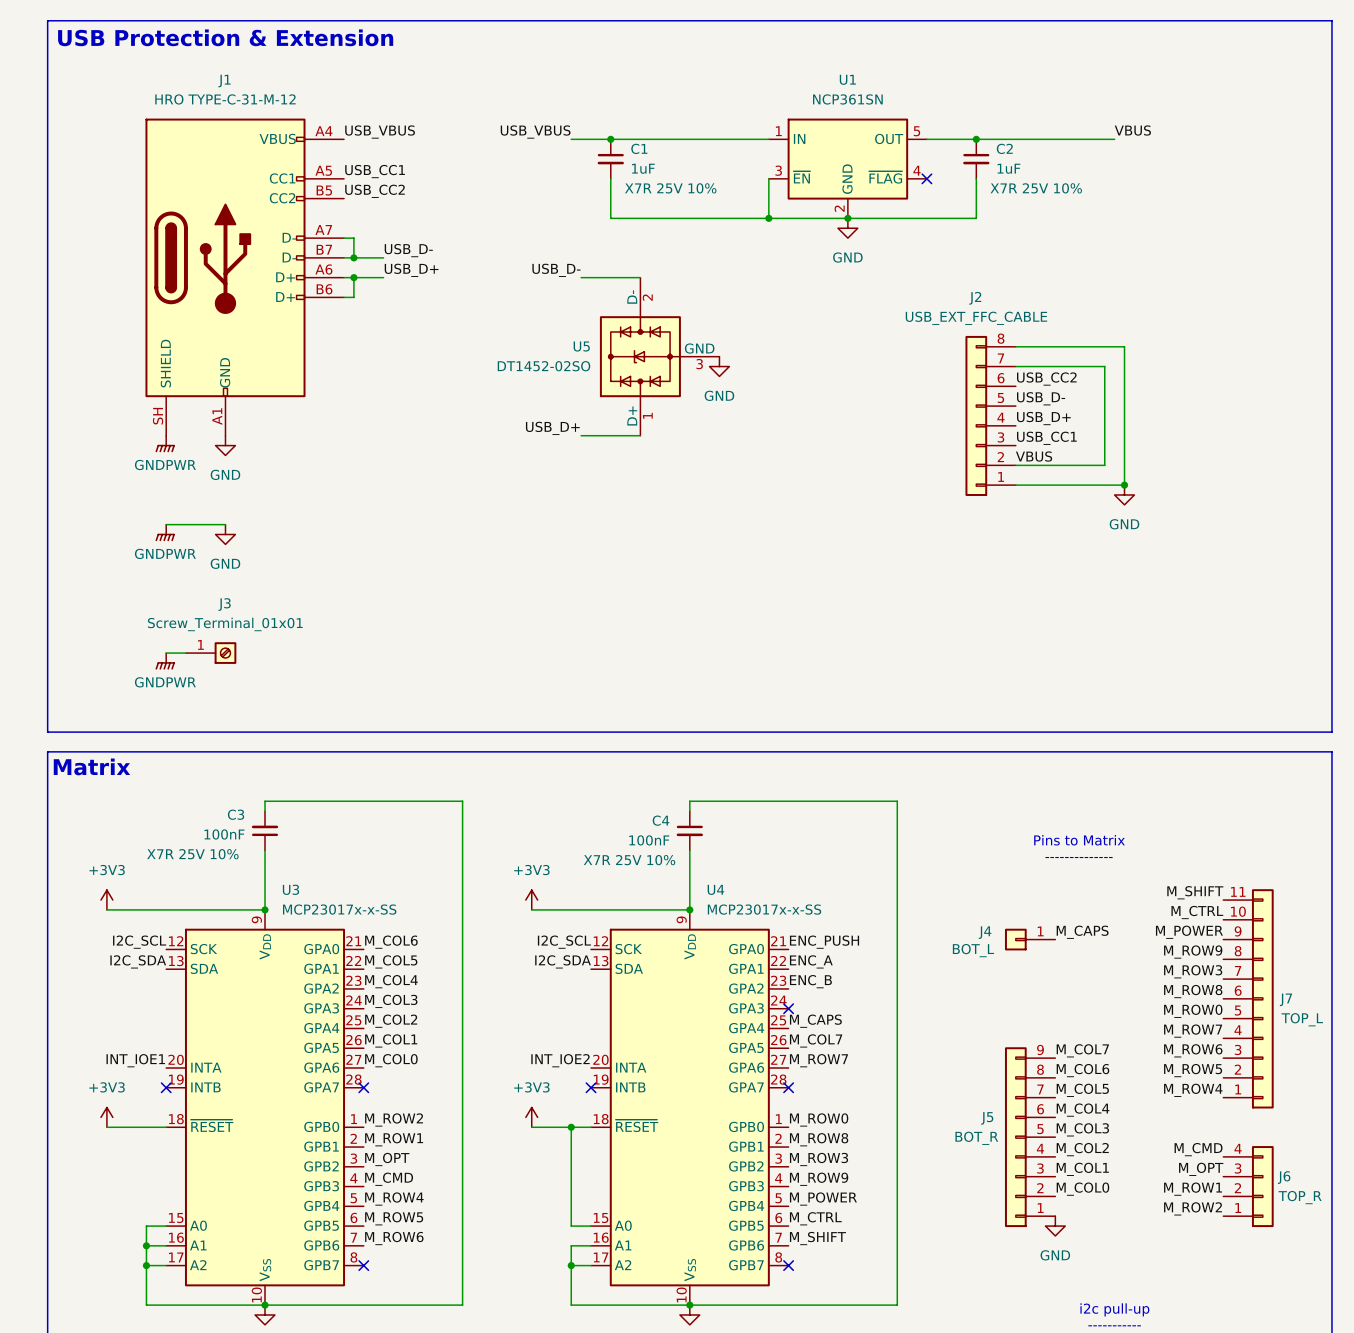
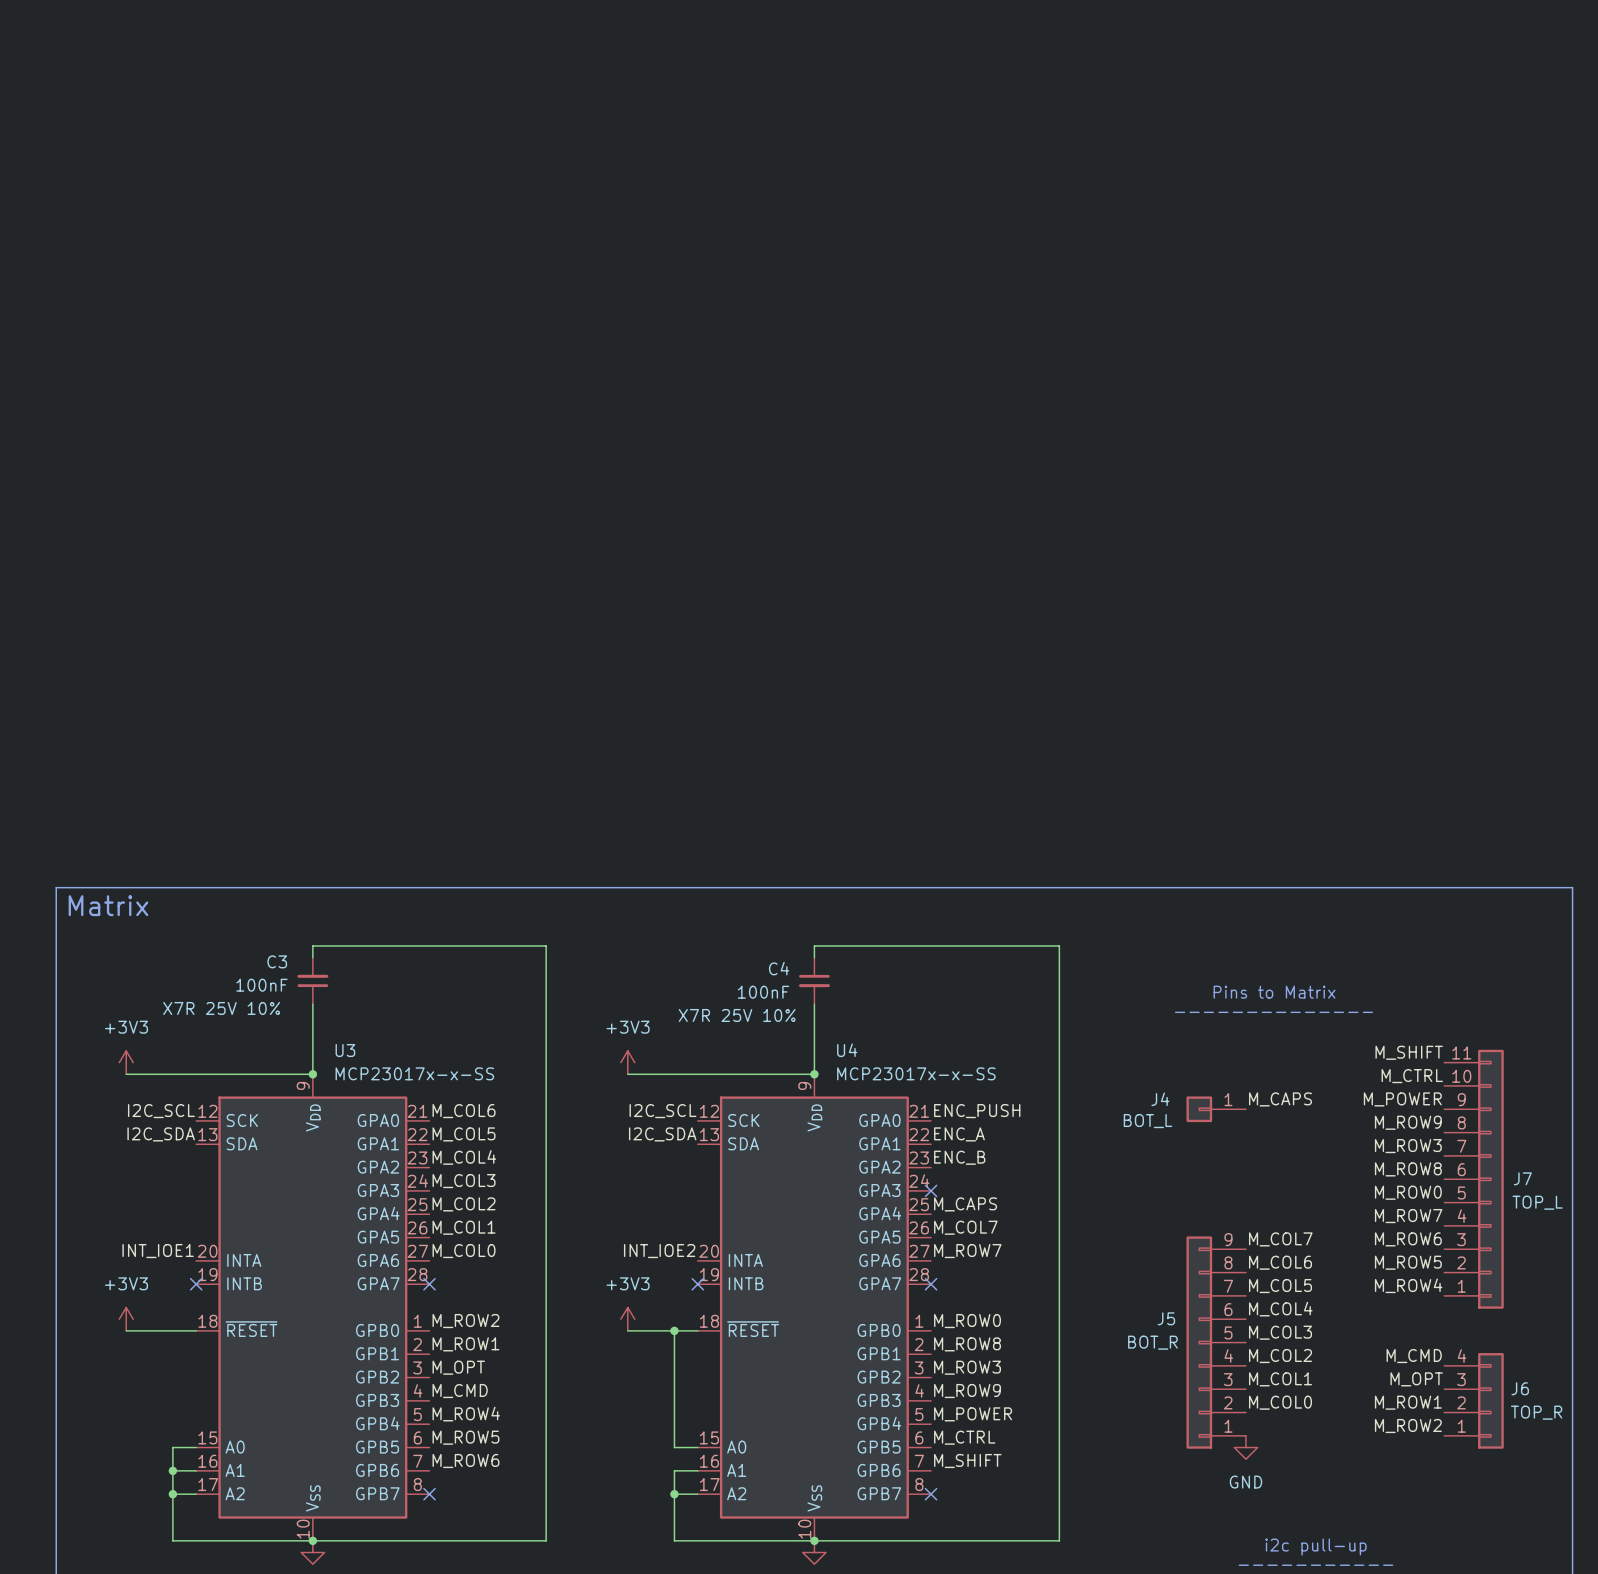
line: (47, 20) (1331, 20) (1331, 732) (47, 732) (47, 20) -> none
text: USB Protection & Extension (225, 37) -> none
label: VBUS (1132, 130) -> none
label: USB_VBUS (380, 132) -> none
label: USB_VBUS (535, 132) -> none
wire: (571, 139) (768, 139) -> none
junction: (610, 139) -> none
wire: (926, 139) (1114, 139) -> none
junction: (976, 139) -> none
C1: 1uF (610, 159) -> none
C2: 1uF (976, 159) -> none
U1: NCP361SN (847, 168) -> none
label: USB_CC1 (375, 171) -> none
wire: (610, 178) (610, 218) (976, 218) (976, 178) -> none
wire: (768, 178) (768, 218) -> none
no-connect mark: (926, 178) -> none
label: USB_CC2 (375, 191) -> none
junction: (768, 218) -> none
junction: (847, 218) -> none
power symbol: GND (847, 228) -> none
wire: (344, 238) (353, 238) (353, 257) -> none
label: USB_D- (408, 250) -> none
wire: (344, 257) (383, 257) -> none
junction: (353, 257) -> none
label: USB_D+ (411, 270) -> none
label: USB_D- (556, 270) -> none
J1: HRO TYPE-C-31-M-12 (244, 277) -> none
wire: (344, 277) (383, 277) -> none
wire: (353, 277) (353, 297) (344, 297) -> none
junction: (353, 277) -> none
wire: (581, 277) (640, 277) -> none
wire: (1015, 346) (1124, 346) (1124, 485) (1015, 485) -> none
U5: DT1452-02SO (659, 356) -> none
power symbol: GND (719, 366) -> none
wire: (1015, 366) (1104, 366) (1104, 465) (1015, 465) -> none
label: USB_CC2 (1046, 379) -> none
label: USB_D- (1041, 398) -> none
J2: USB_EXT_FFC_CABLE (990, 415) -> none
label: USB_D+ (1043, 418) -> none
label: USB_D+ (552, 428) -> none
wire: (581, 435) (640, 435) -> none
label: USB_CC1 (1046, 438) -> none
power symbol: GNDPWR (165, 444) -> none
power symbol: GND (225, 445) -> none
label: VBUS (1034, 456) -> none
junction: (1124, 485) -> none
power symbol: GND (1124, 494) -> none
wire: (166, 524) (225, 524) -> none
power symbol: GNDPWR (165, 532) -> none
power symbol: GND (225, 534) -> none
wire: (166, 653) (185, 653) -> none
J3: Screw_Terminal_01x01 (211, 653) -> none
power symbol: GNDPWR (165, 661) -> none

